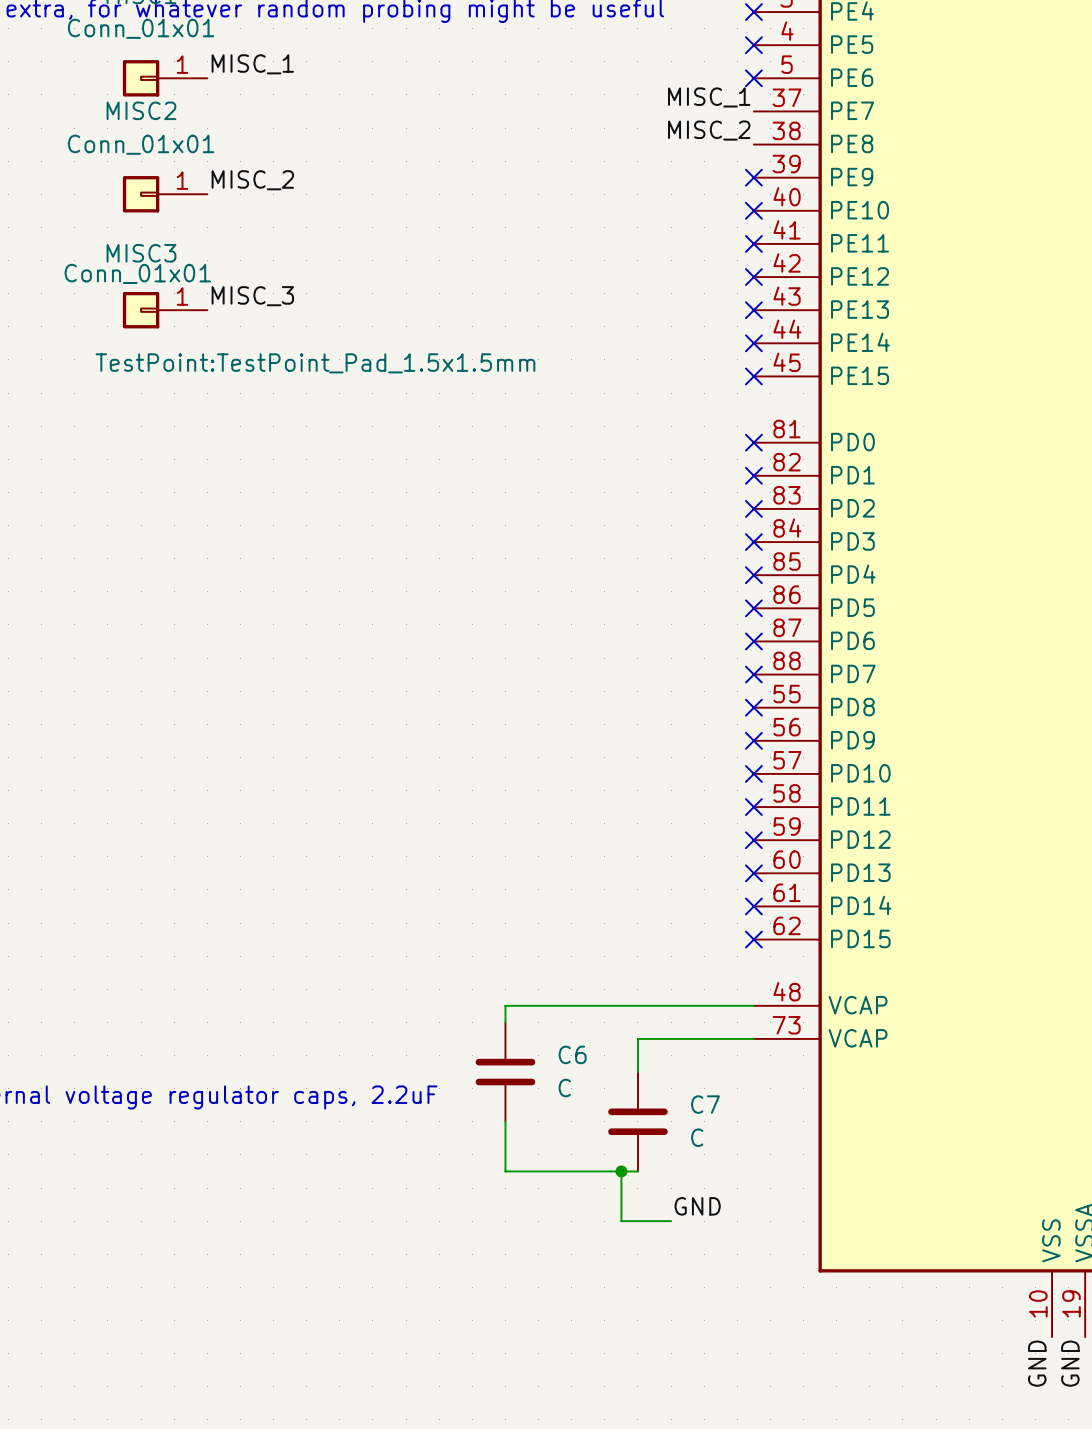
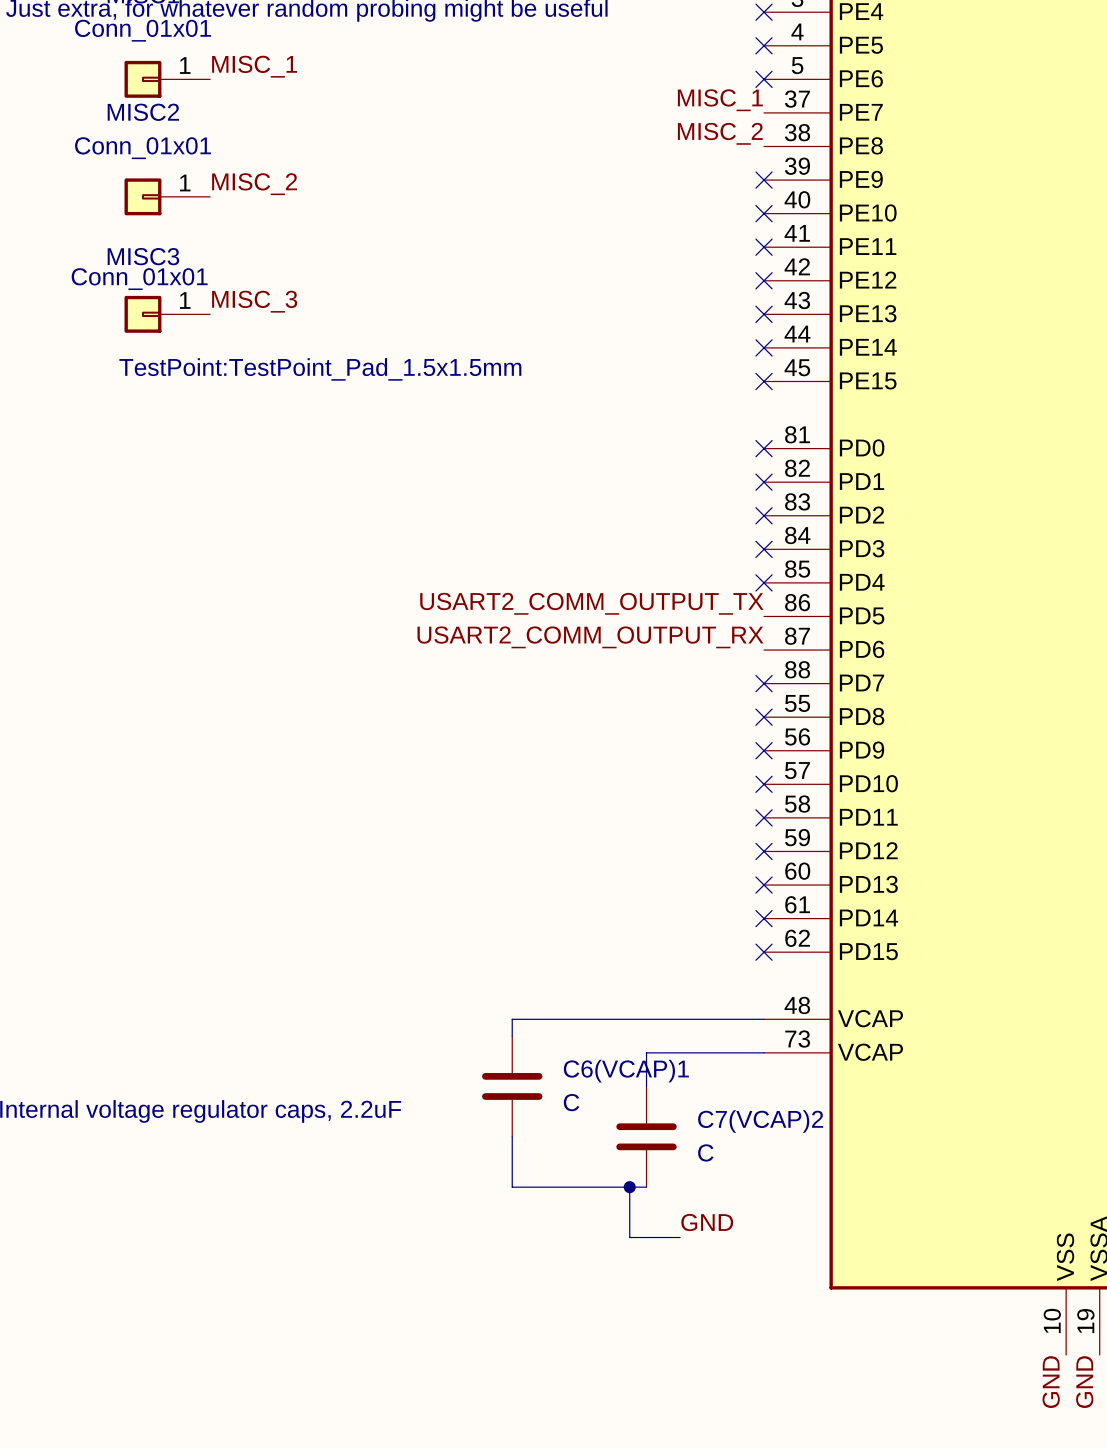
label: none -> USART2_COMM_OUTPUT_TX (591, 603)
no-connect mark: (753, 608) -> none
label: none -> USART2_COMM_OUTPUT_RX (590, 637)
no-connect mark: (753, 641) -> none
C6 name: C6 (572, 1054) -> C6(VCAP)1 (626, 1071)
C7 name: C7 (705, 1104) -> C7(VCAP)2 (760, 1121)

